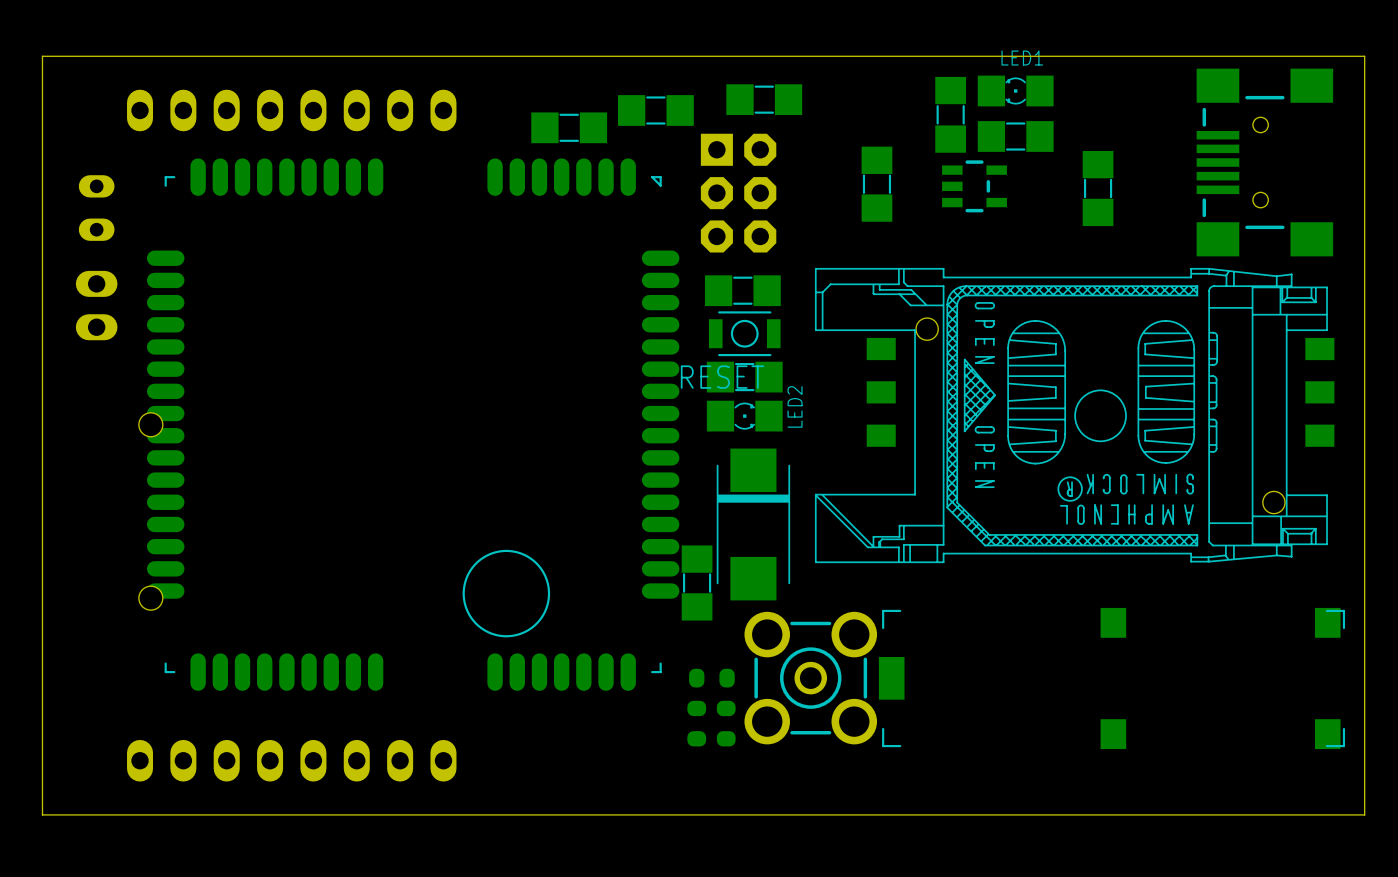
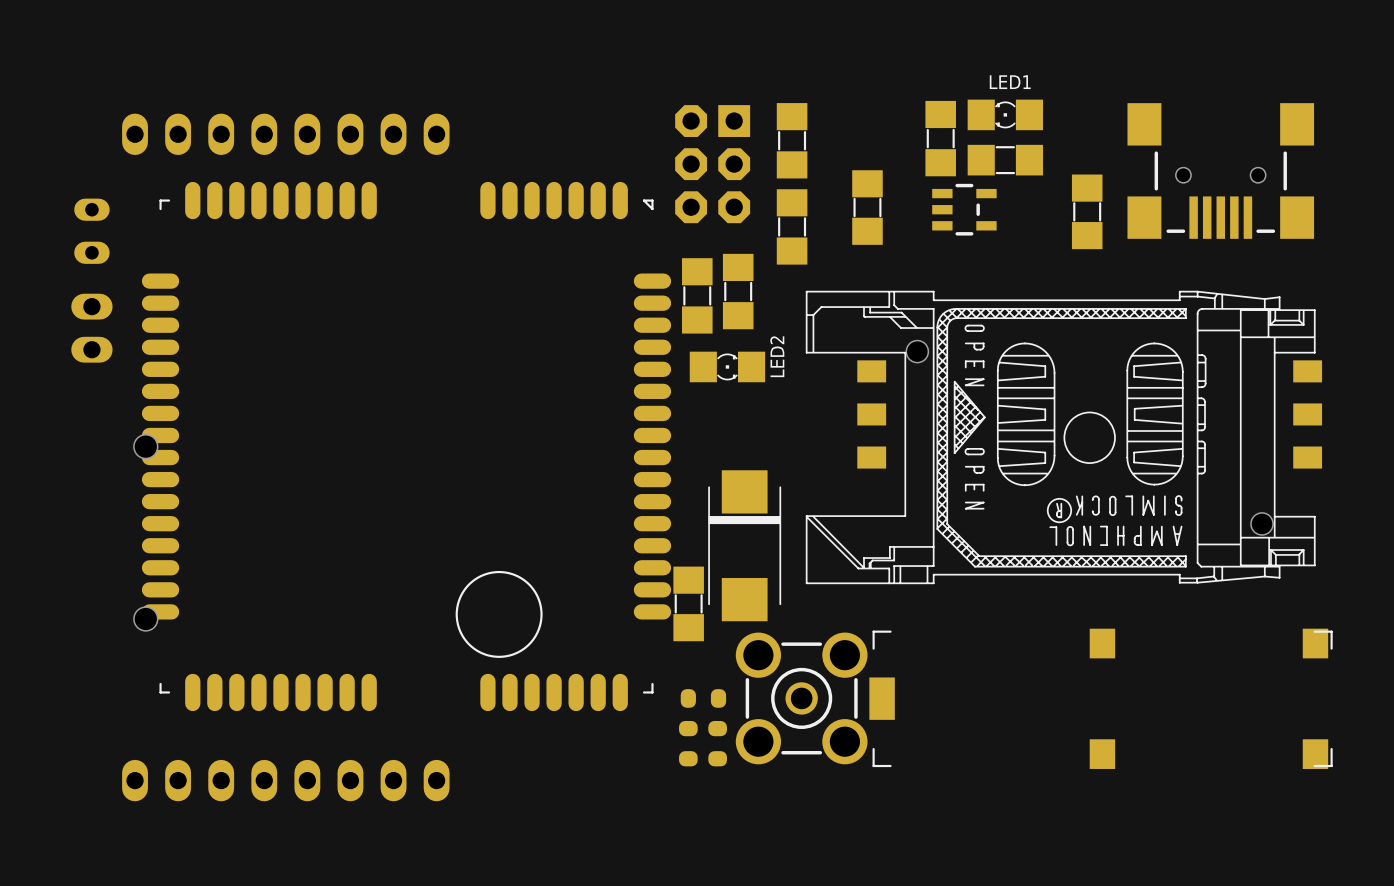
board edge: (1364, 56) (42, 56) (42, 814) (1364, 814) (1364, 56) -> none
part rotation: 0° (764, 99) -> 90° clockwise (792, 140)
part: (655, 110) -> none
part: (569, 127) -> none
part rotation: 0° (1264, 162) -> 90° counterclockwise (1220, 170)
part side: bottom (738, 193) -> top (712, 164)
part: none -> (792, 226)
part: none -> (738, 291)
part: none -> (697, 295)
part: (742, 290) -> none
RESET: (744, 333) -> none
part: (744, 377) -> none
LED2 position: (744, 416) -> (727, 366)

